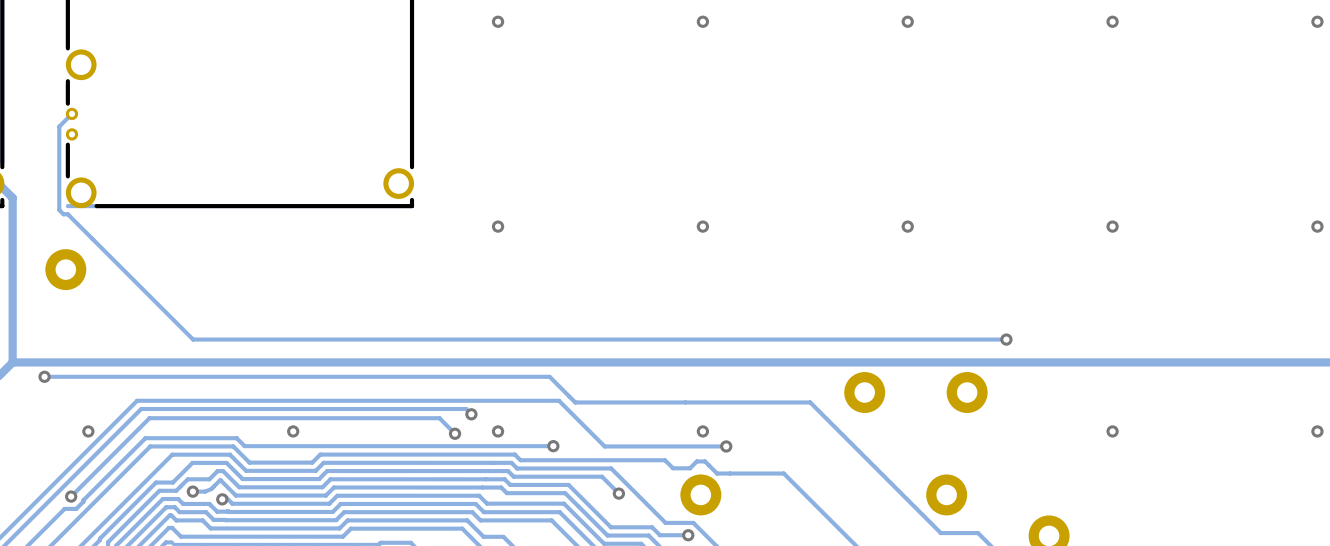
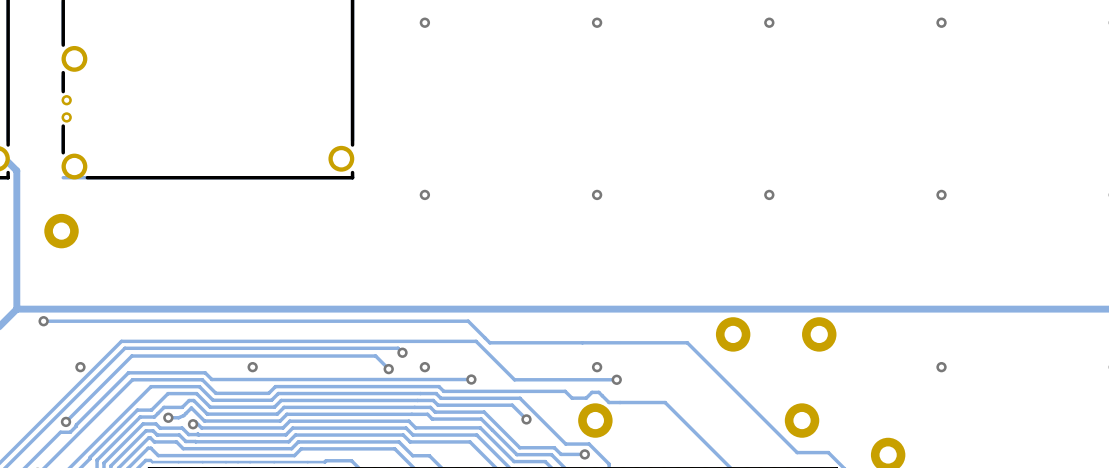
track: (71, 113) (59, 126) (59, 210) (63, 214) (67, 214) (193, 339) (1006, 339) -> none
via: (1006, 339) -> none

